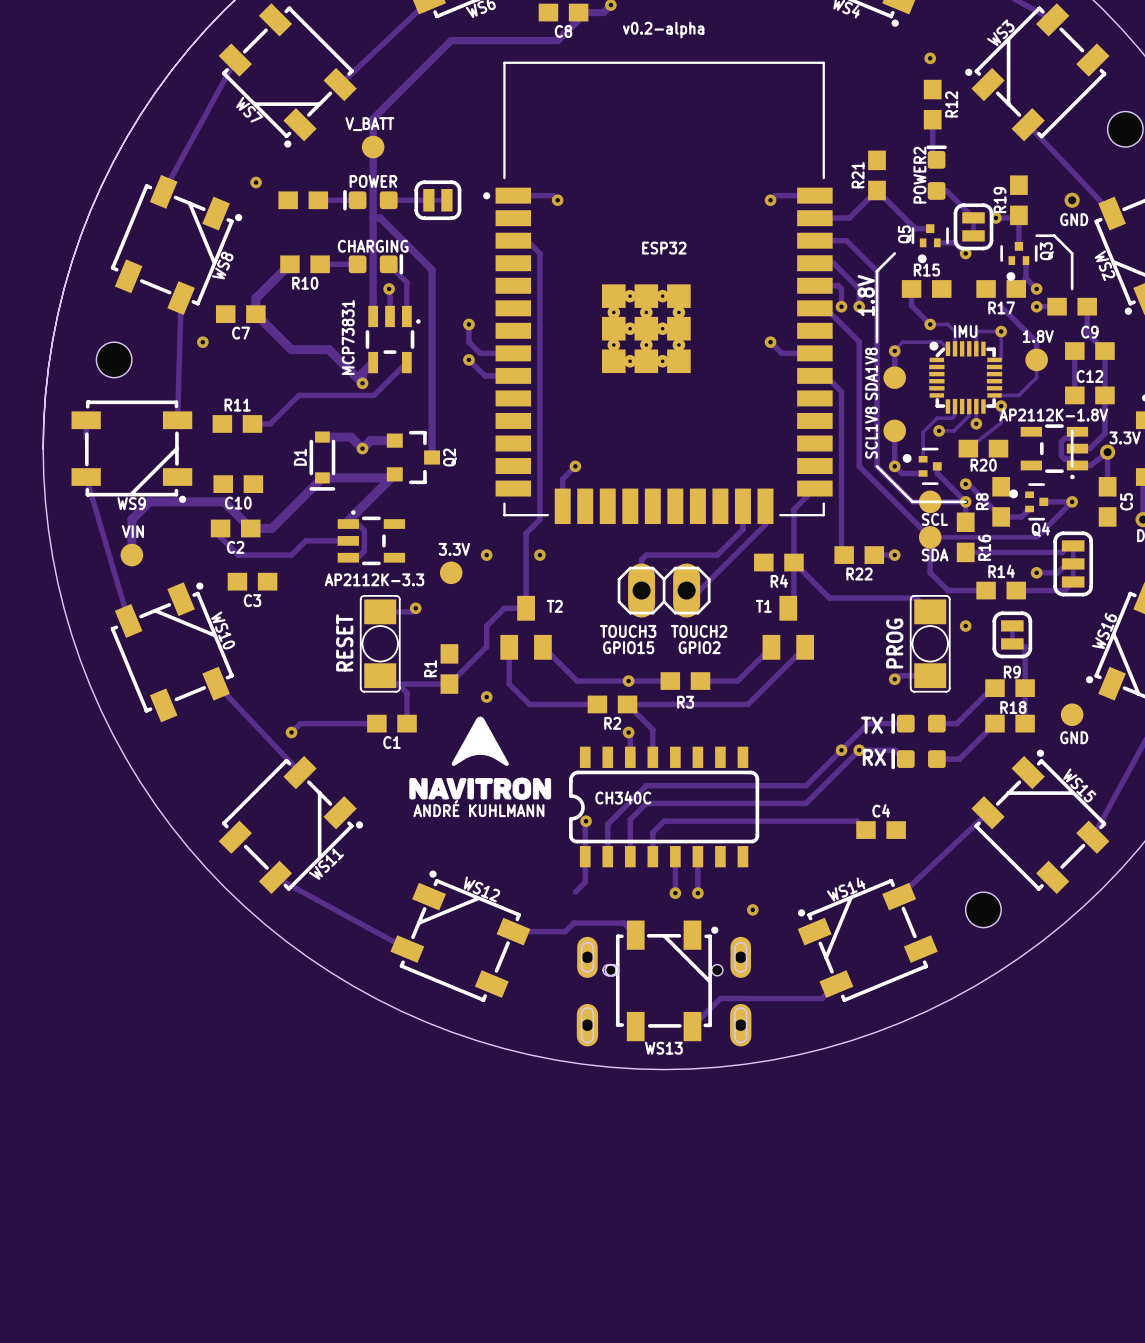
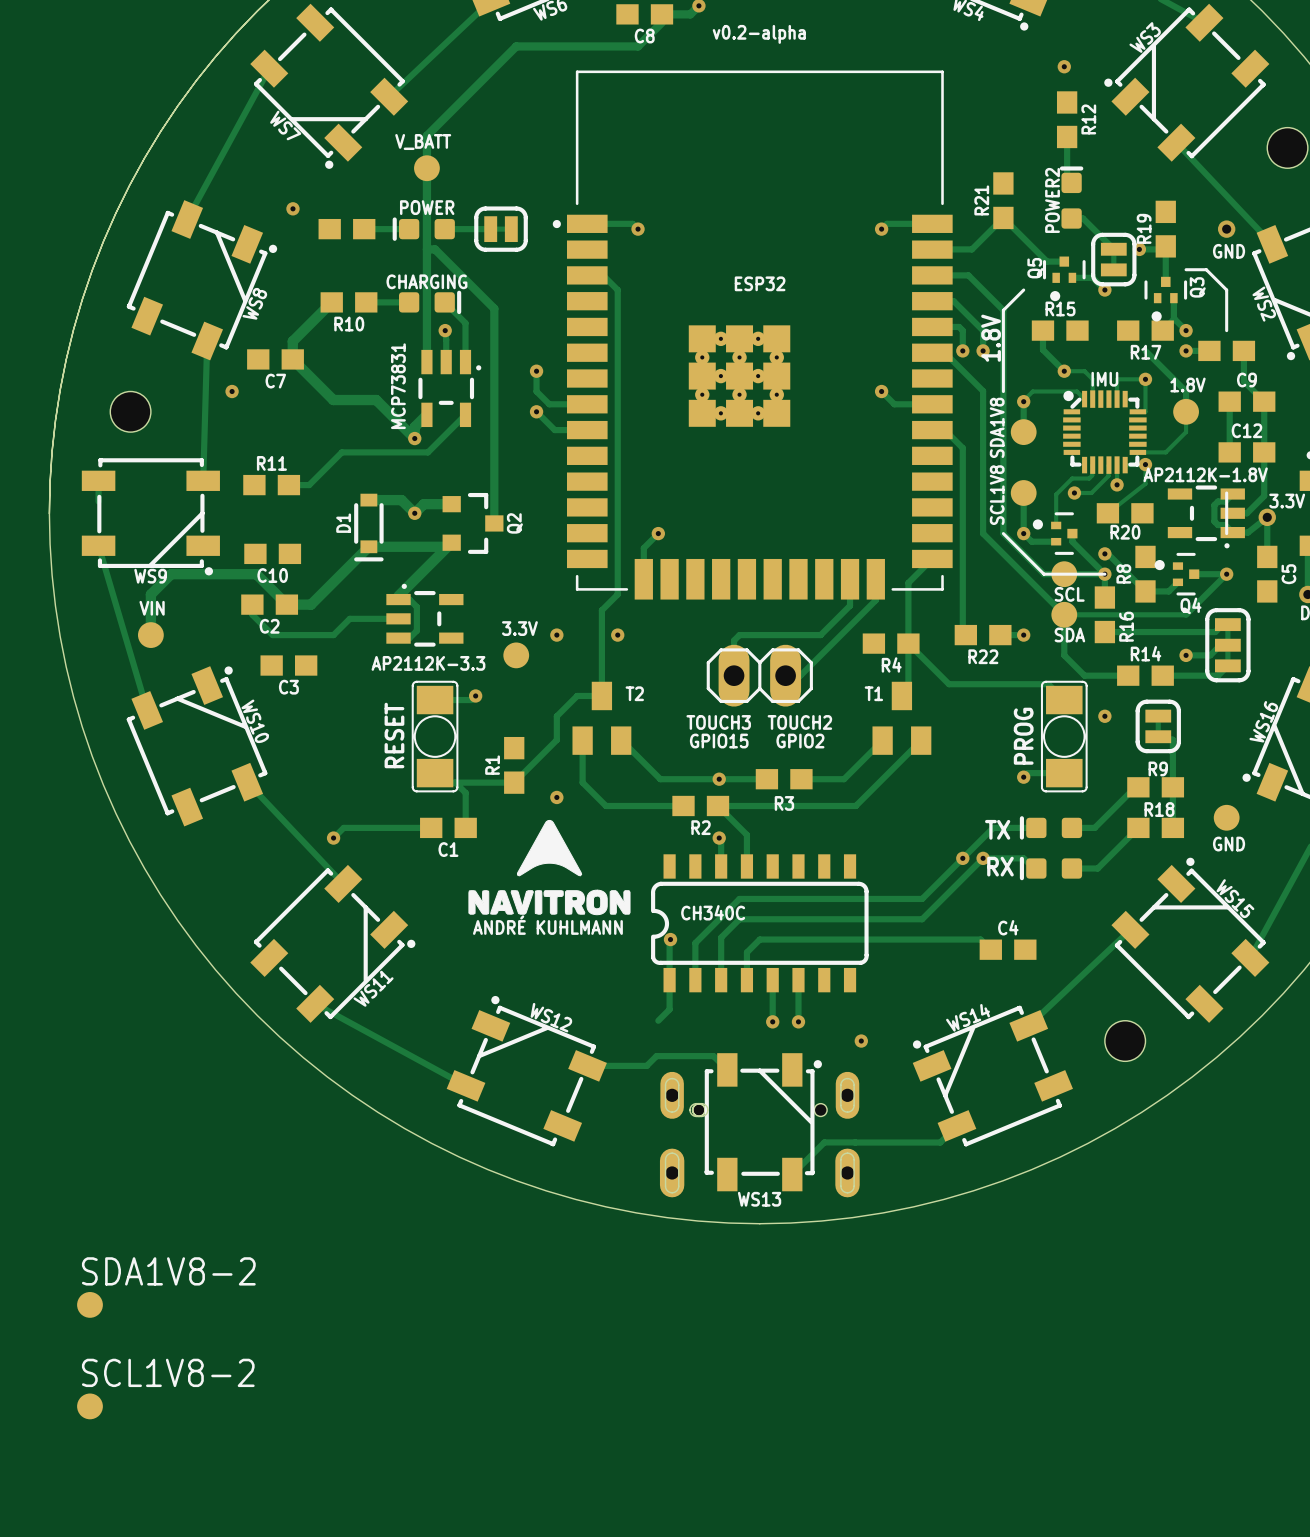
SDA1V8-2: none -> (89, 1304)
SCL1V8-2: none -> (89, 1406)

